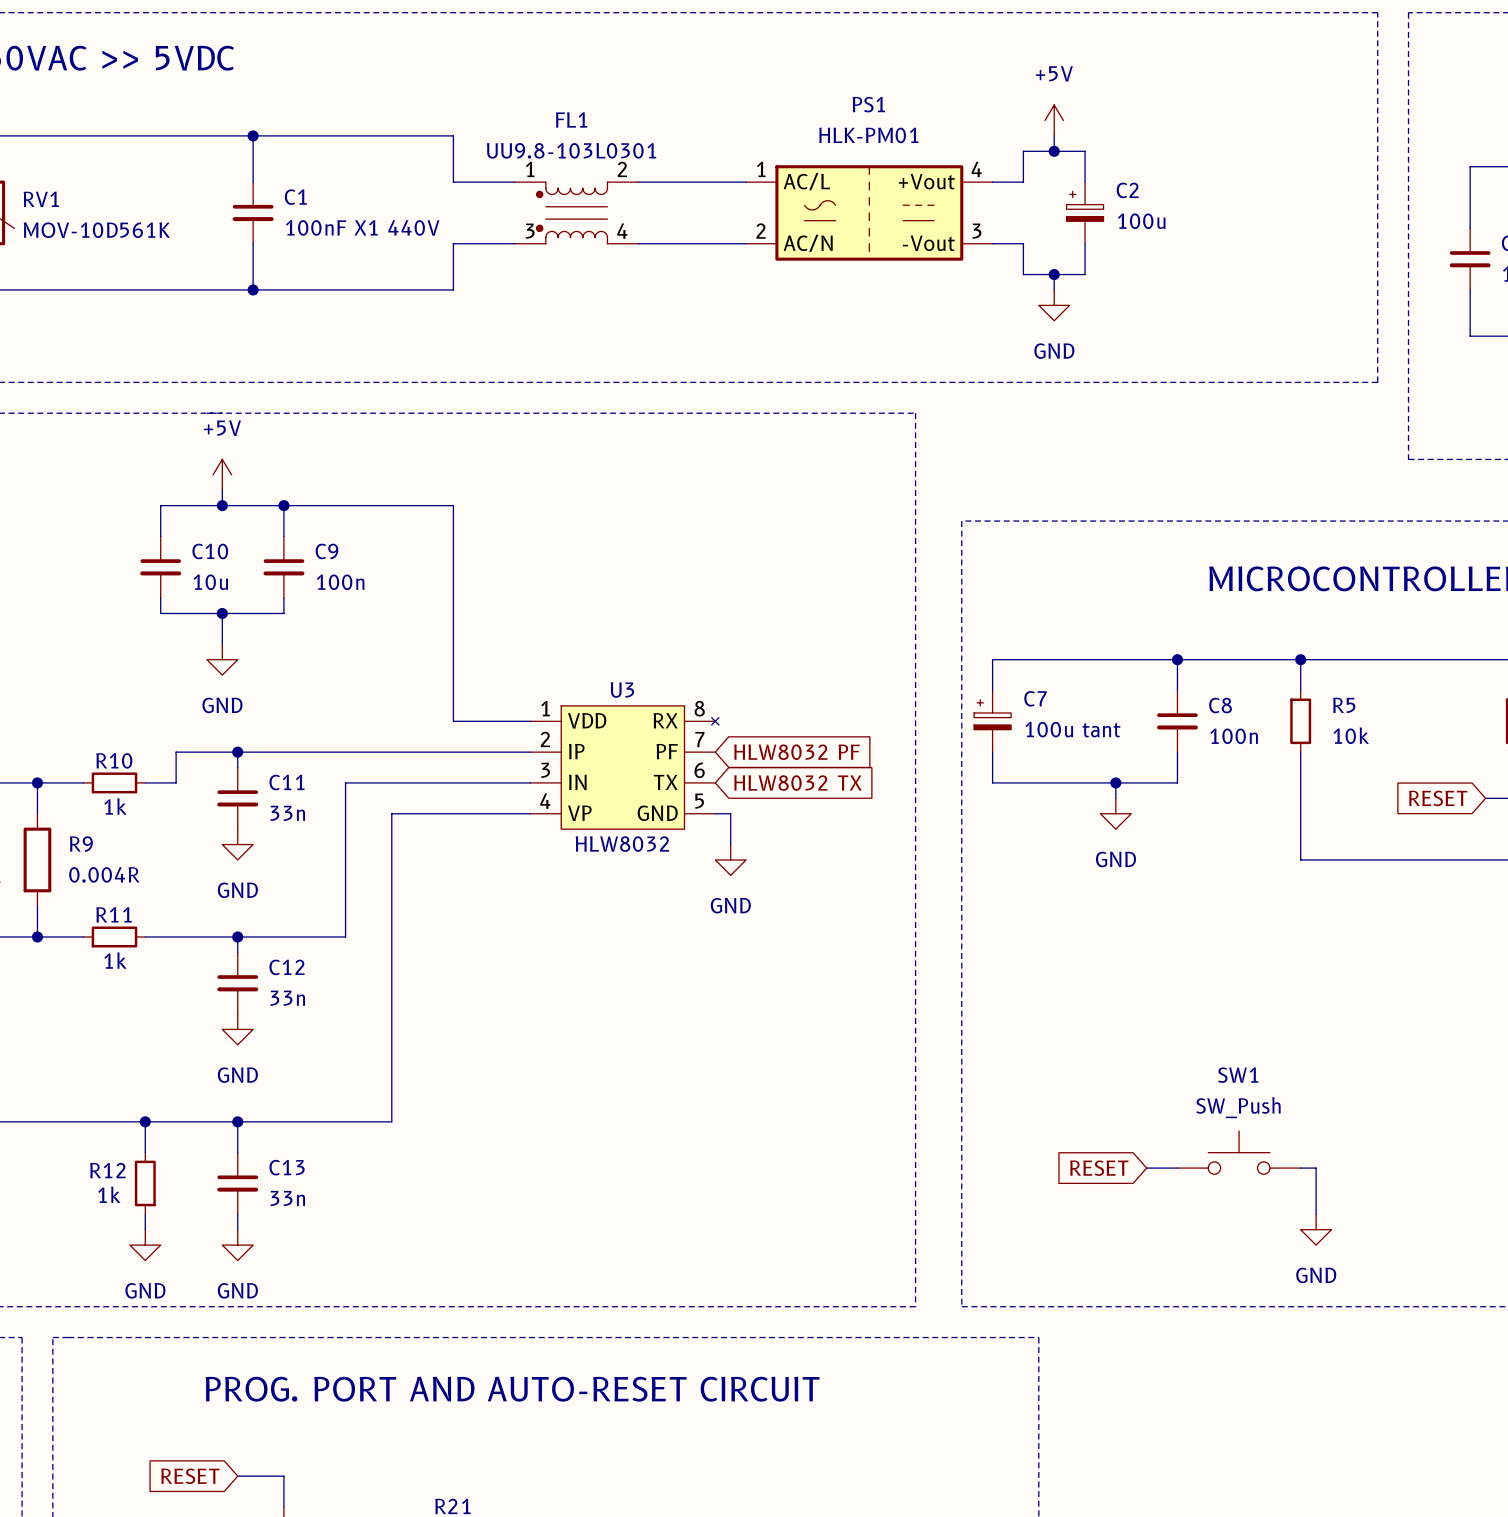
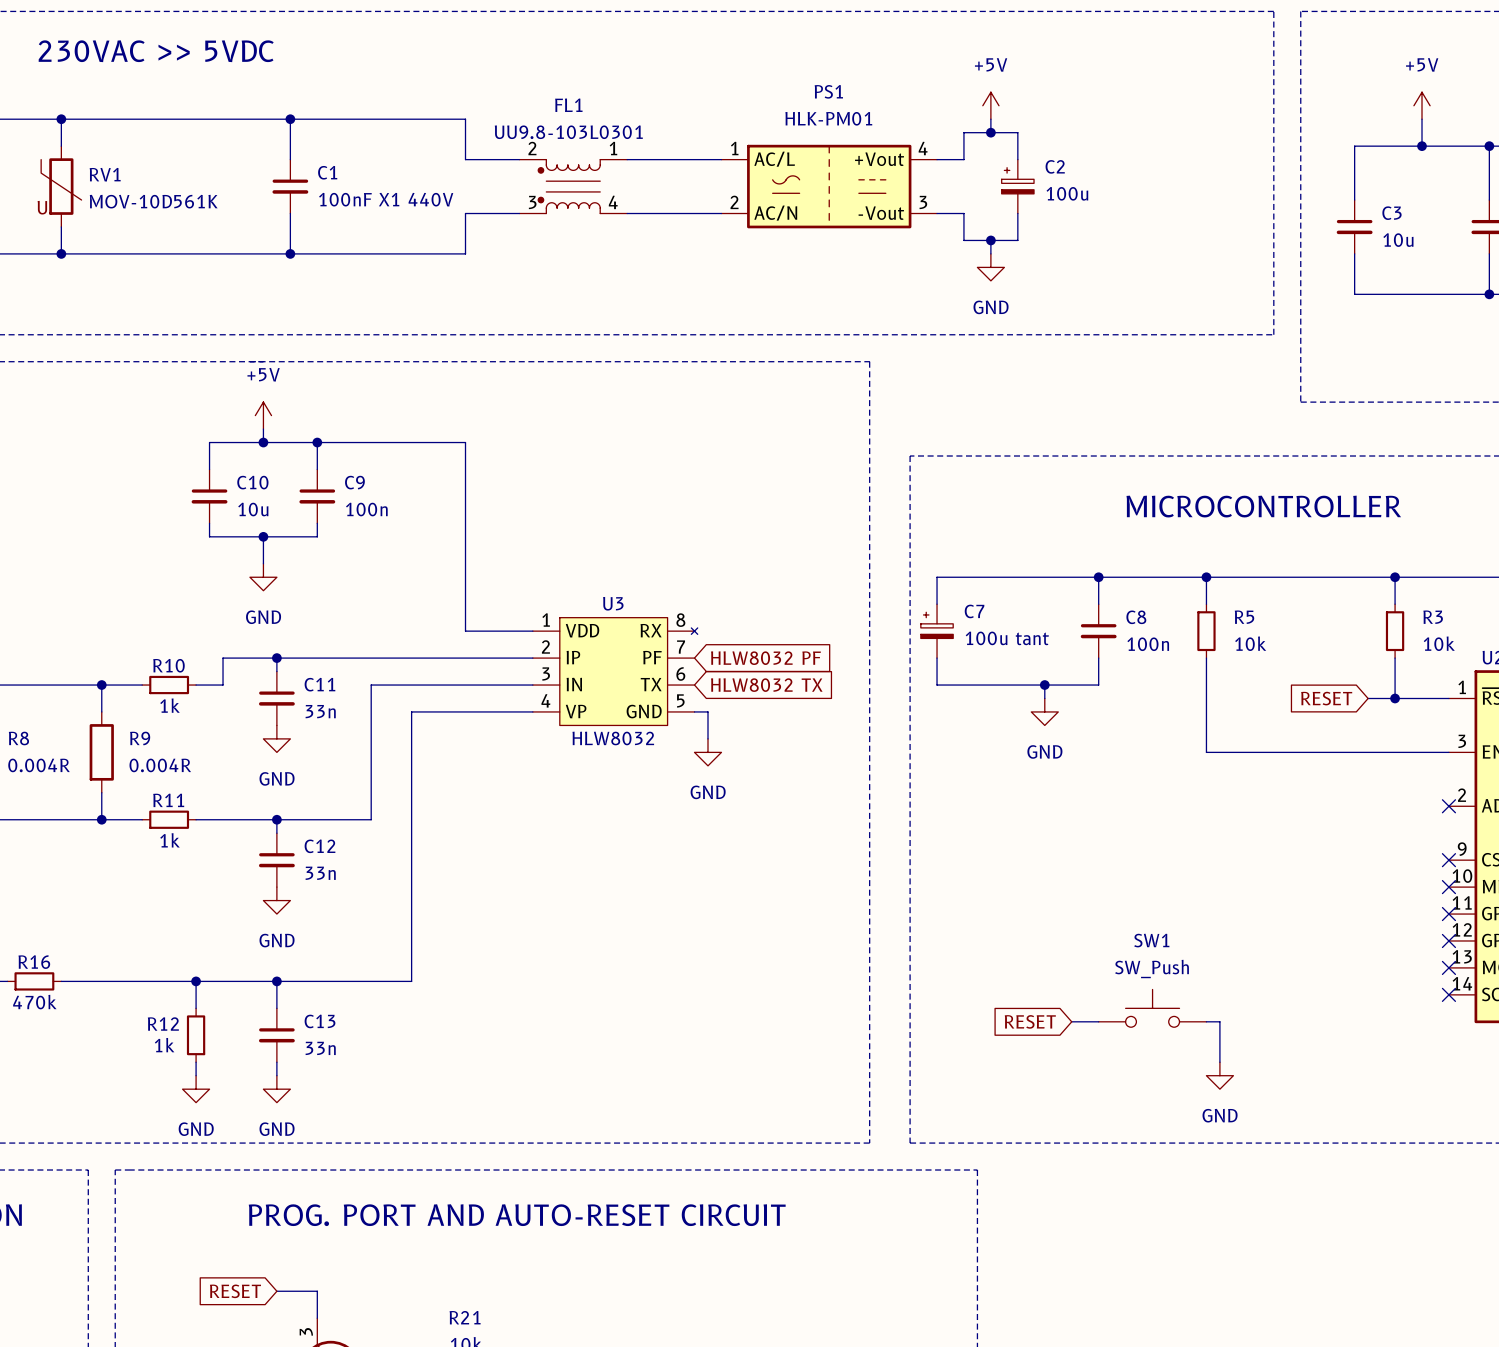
FL1 pin number: 1 (530, 169) -> 2 (532, 148)
FL1 pin number: 2 (622, 169) -> 1 (613, 148)

